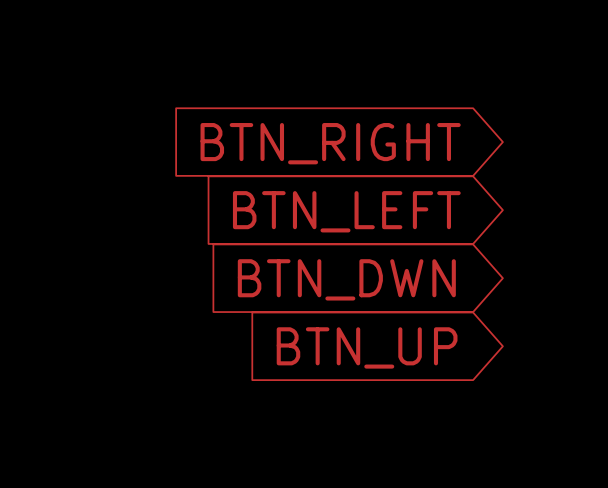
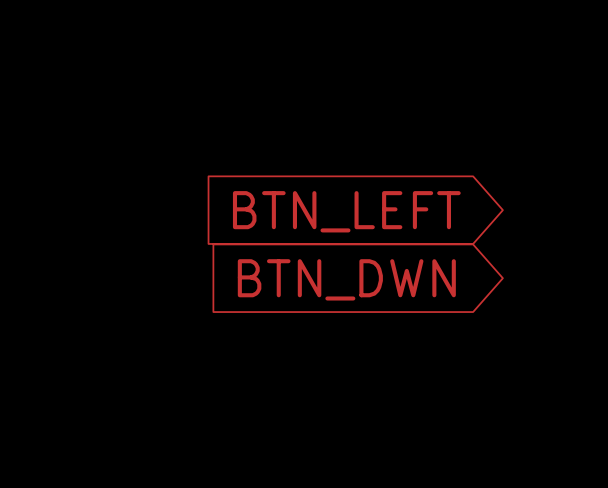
global label: BTN_RIGHT (330, 143) -> none
global label: BTN_UP (367, 347) -> none

